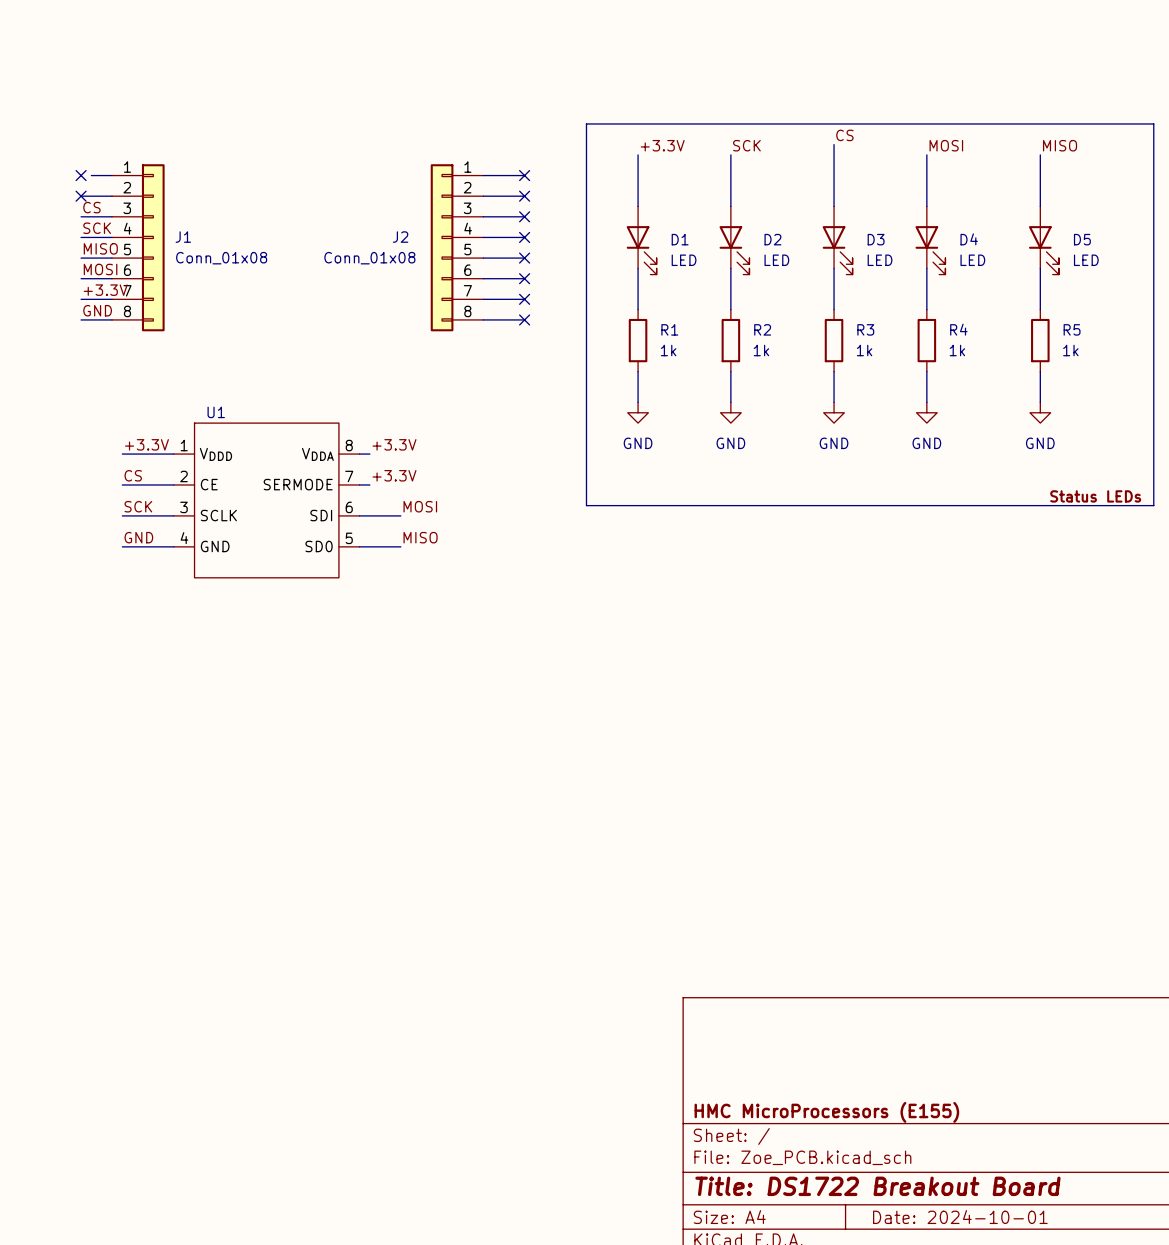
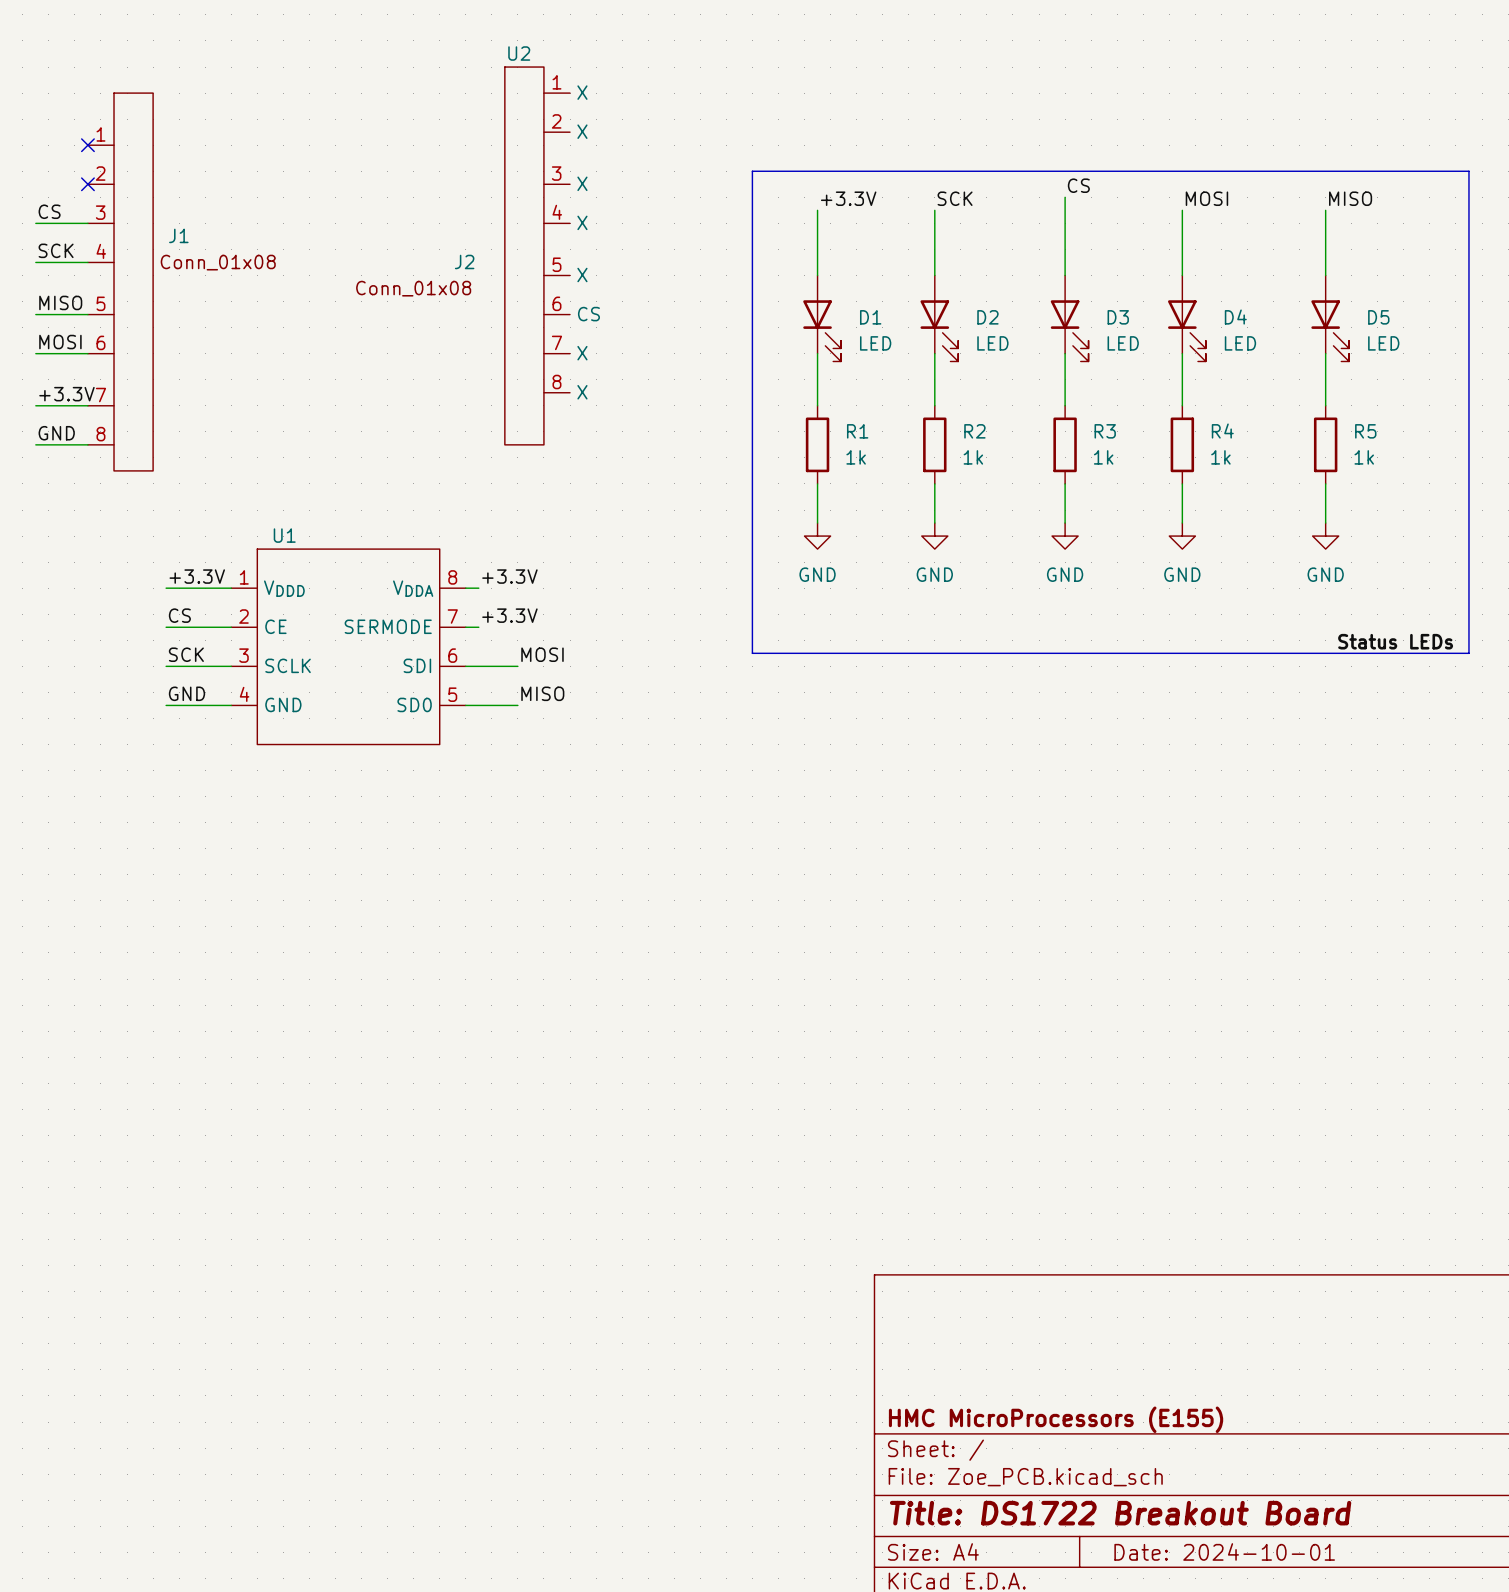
no-connect mark: none -> (87, 145)
no-connect mark: none -> (87, 184)
J1 symbol: [112, 164, 165, 332] -> [87, 93, 154, 471]
wire: none -> (35, 223) (87, 223)
no-connect mark: (81, 175) -> none
wire: (91, 175) (112, 175) -> none
wire: (483, 175) (524, 175) -> none
no-connect mark: (524, 175) -> none
U2: none -> J2 (537, 255)
wire: none -> (35, 262) (87, 262)
wire: (81, 196) (112, 196) -> none
no-connect mark: (81, 196) -> none
wire: (483, 196) (524, 196) -> none
no-connect mark: (524, 196) -> none
label position: CS (91, 207) -> CS (49, 211)
wire: (81, 216) (112, 216) -> none
wire: (483, 216) (524, 216) -> none
no-connect mark: (524, 216) -> none
label position: SCK (97, 228) -> SCK (56, 250)
wire: none -> (35, 314) (87, 314)
wire: (81, 237) (112, 237) -> none
J1 name position: J1 (183, 237) -> J1 (178, 235)
wire: (483, 237) (524, 237) -> none
no-connect mark: (524, 237) -> none
J2: Conn_01x08 (457, 247) -> none
label position: MISO (100, 248) -> MISO (60, 302)
wire: (81, 258) (112, 258) -> none
J1 value: Conn_01x08 (221, 258) -> none
wire: (483, 258) (524, 258) -> none
no-connect mark: (524, 258) -> none
wire: none -> (35, 353) (87, 353)
label position: MOSI (100, 269) -> MOSI (60, 342)
wire: (81, 278) (112, 278) -> none
wire: (483, 278) (524, 278) -> none
no-connect mark: (524, 278) -> none
label position: +3.3V (105, 290) -> +3.3V (66, 394)
wire: (81, 299) (112, 299) -> none
wire: (483, 299) (524, 299) -> none
no-connect mark: (524, 299) -> none
wire: none -> (35, 405) (87, 405)
label position: GND (97, 310) -> GND (56, 433)
wire: (81, 319) (112, 319) -> none
wire: (483, 319) (524, 319) -> none
no-connect mark: (524, 319) -> none
wire: none -> (35, 444) (87, 444)

